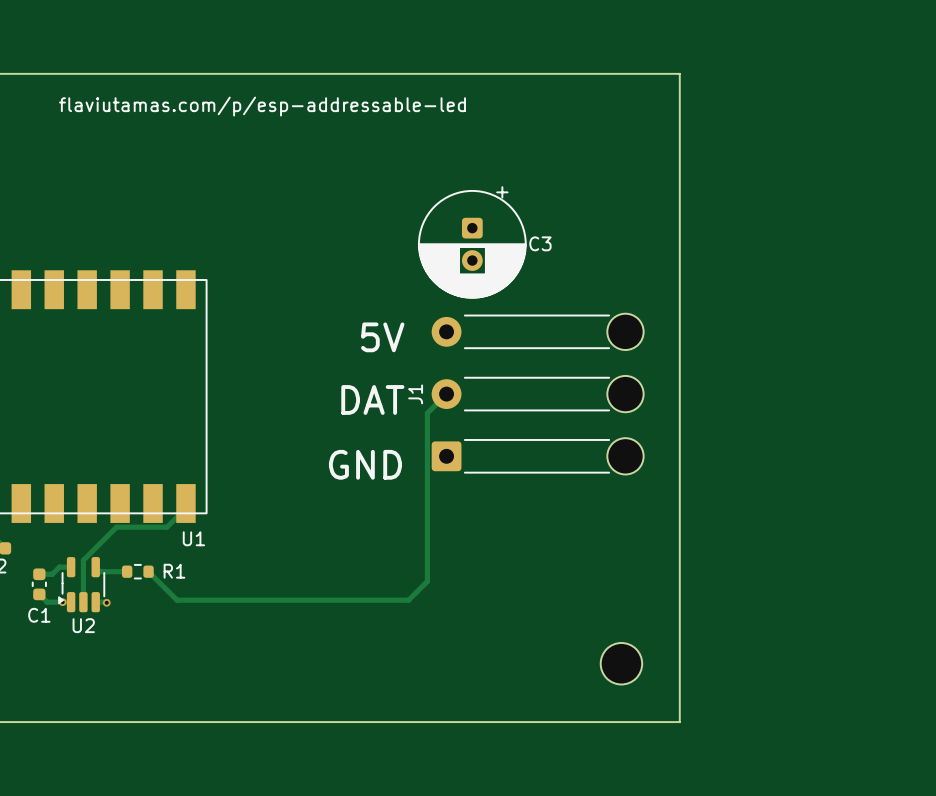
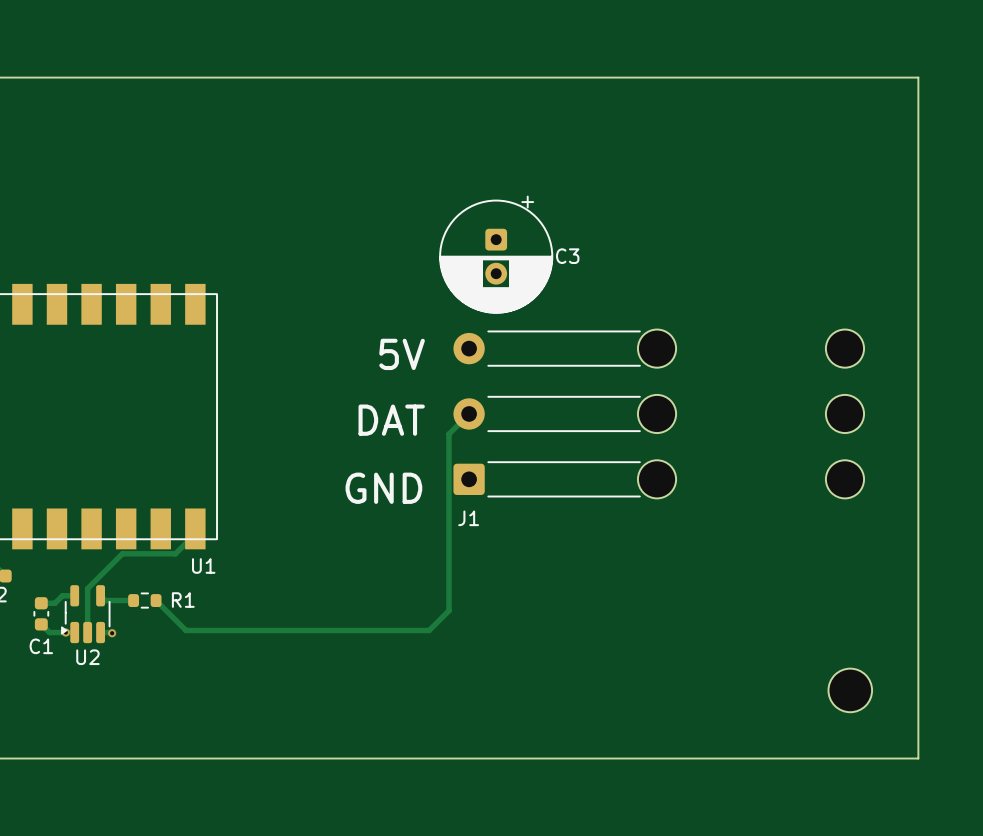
board edge: (679, 73) (679, 722) -> (714, 77) (918, 77) (918, 758) (714, 758)
text: flaviutamas.com/p/esp-addressable-led (262, 106) -> none
J1 footprint: [431, 313, 644, 475] -> [453, 329, 865, 499]
J1 name position: J1 (415, 394) -> J1 (468, 518)
part position: (621, 663) -> (850, 690)

